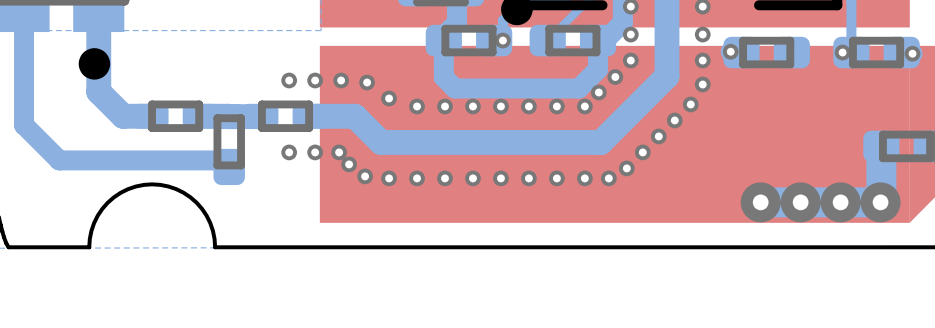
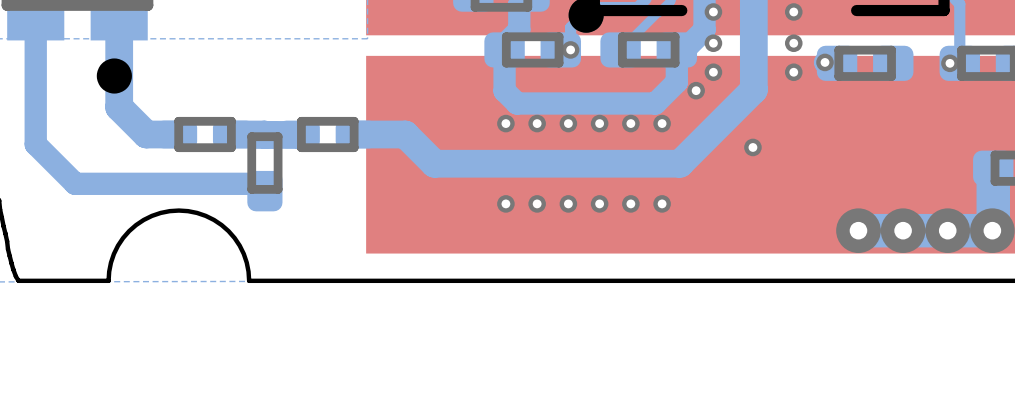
via: (289, 80) -> none
via: (315, 80) -> none
via: (341, 80) -> none
via: (367, 82) -> none
via: (702, 84) -> none
via: (598, 92) -> none
via: (389, 98) -> none
via: (690, 104) -> none
via: (417, 106) -> none
via: (674, 120) -> none
via: none -> (752, 147)
via: (658, 136) -> none
via: (289, 152) -> none
via: (315, 152) -> none
via: (339, 152) -> none
via: (642, 152) -> none
via: (349, 164) -> none
via: (626, 168) -> none
via: (365, 176) -> none
via: (389, 178) -> none
via: (417, 178) -> none
via: (608, 178) -> none

